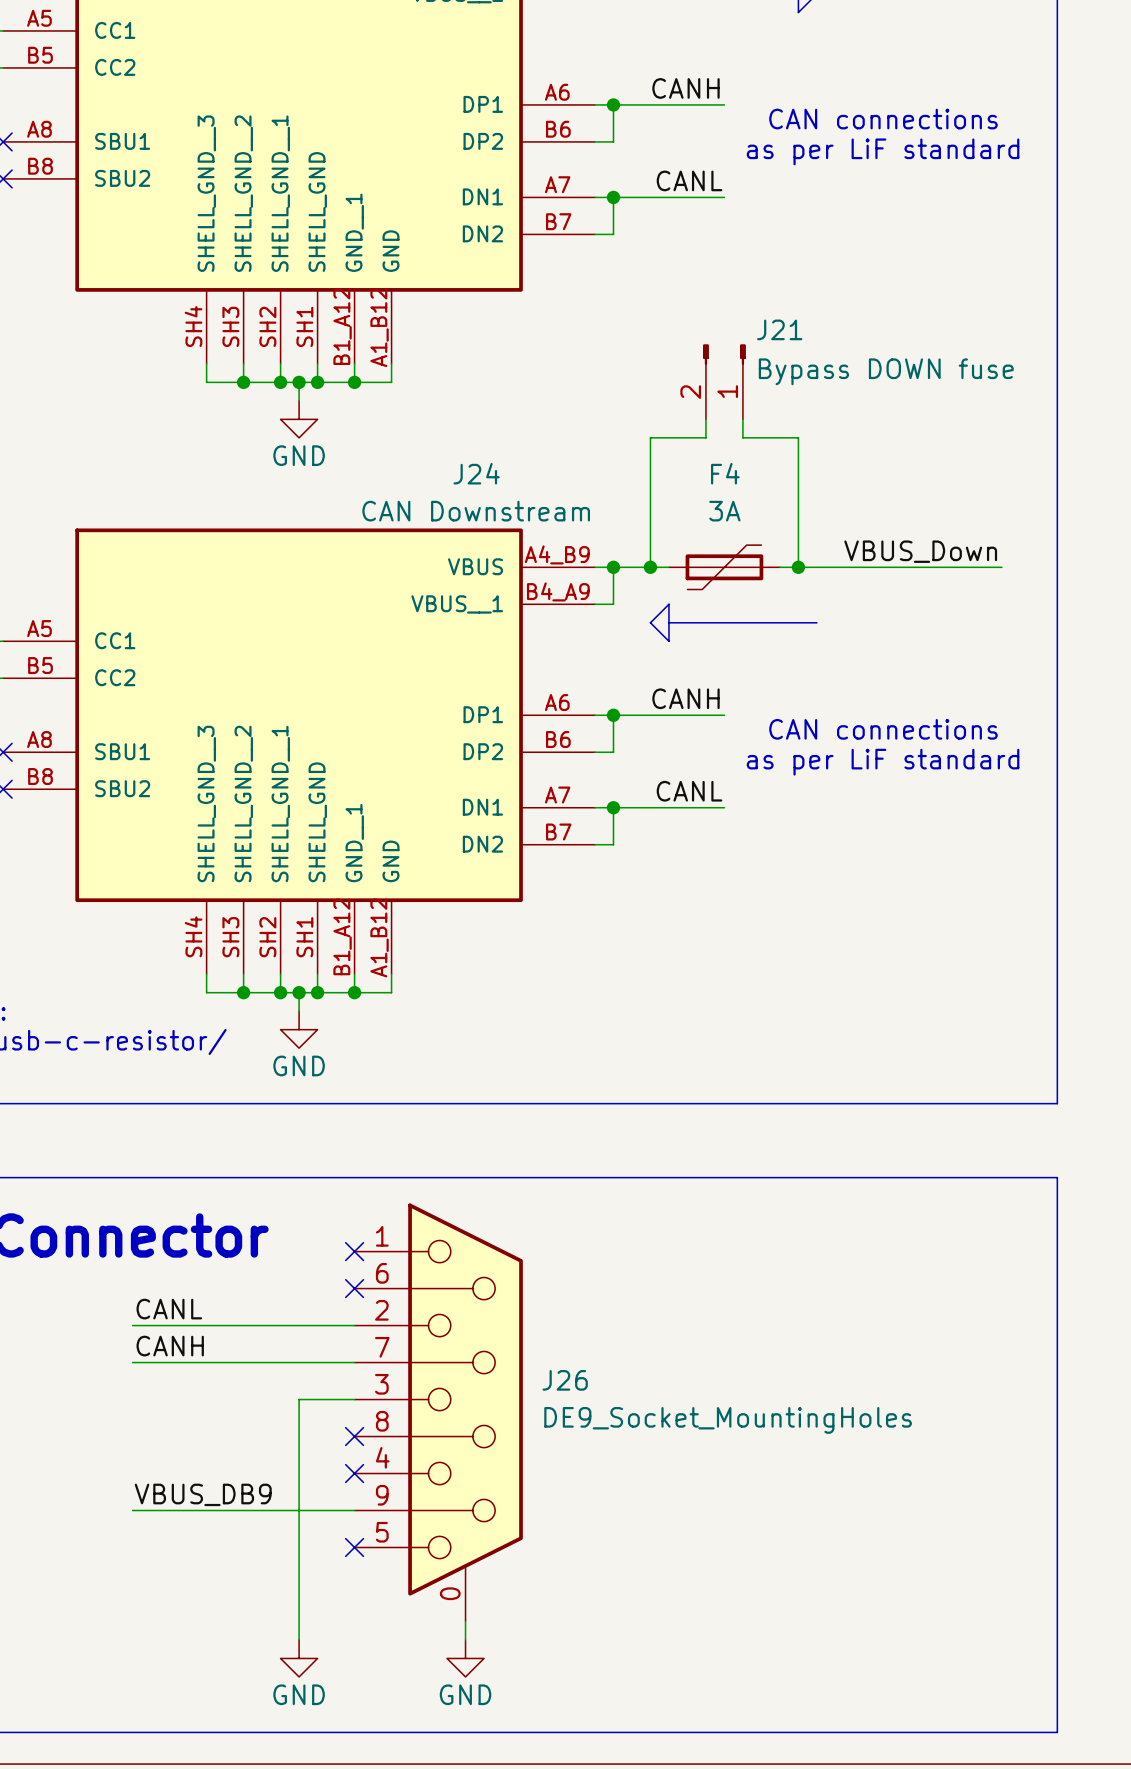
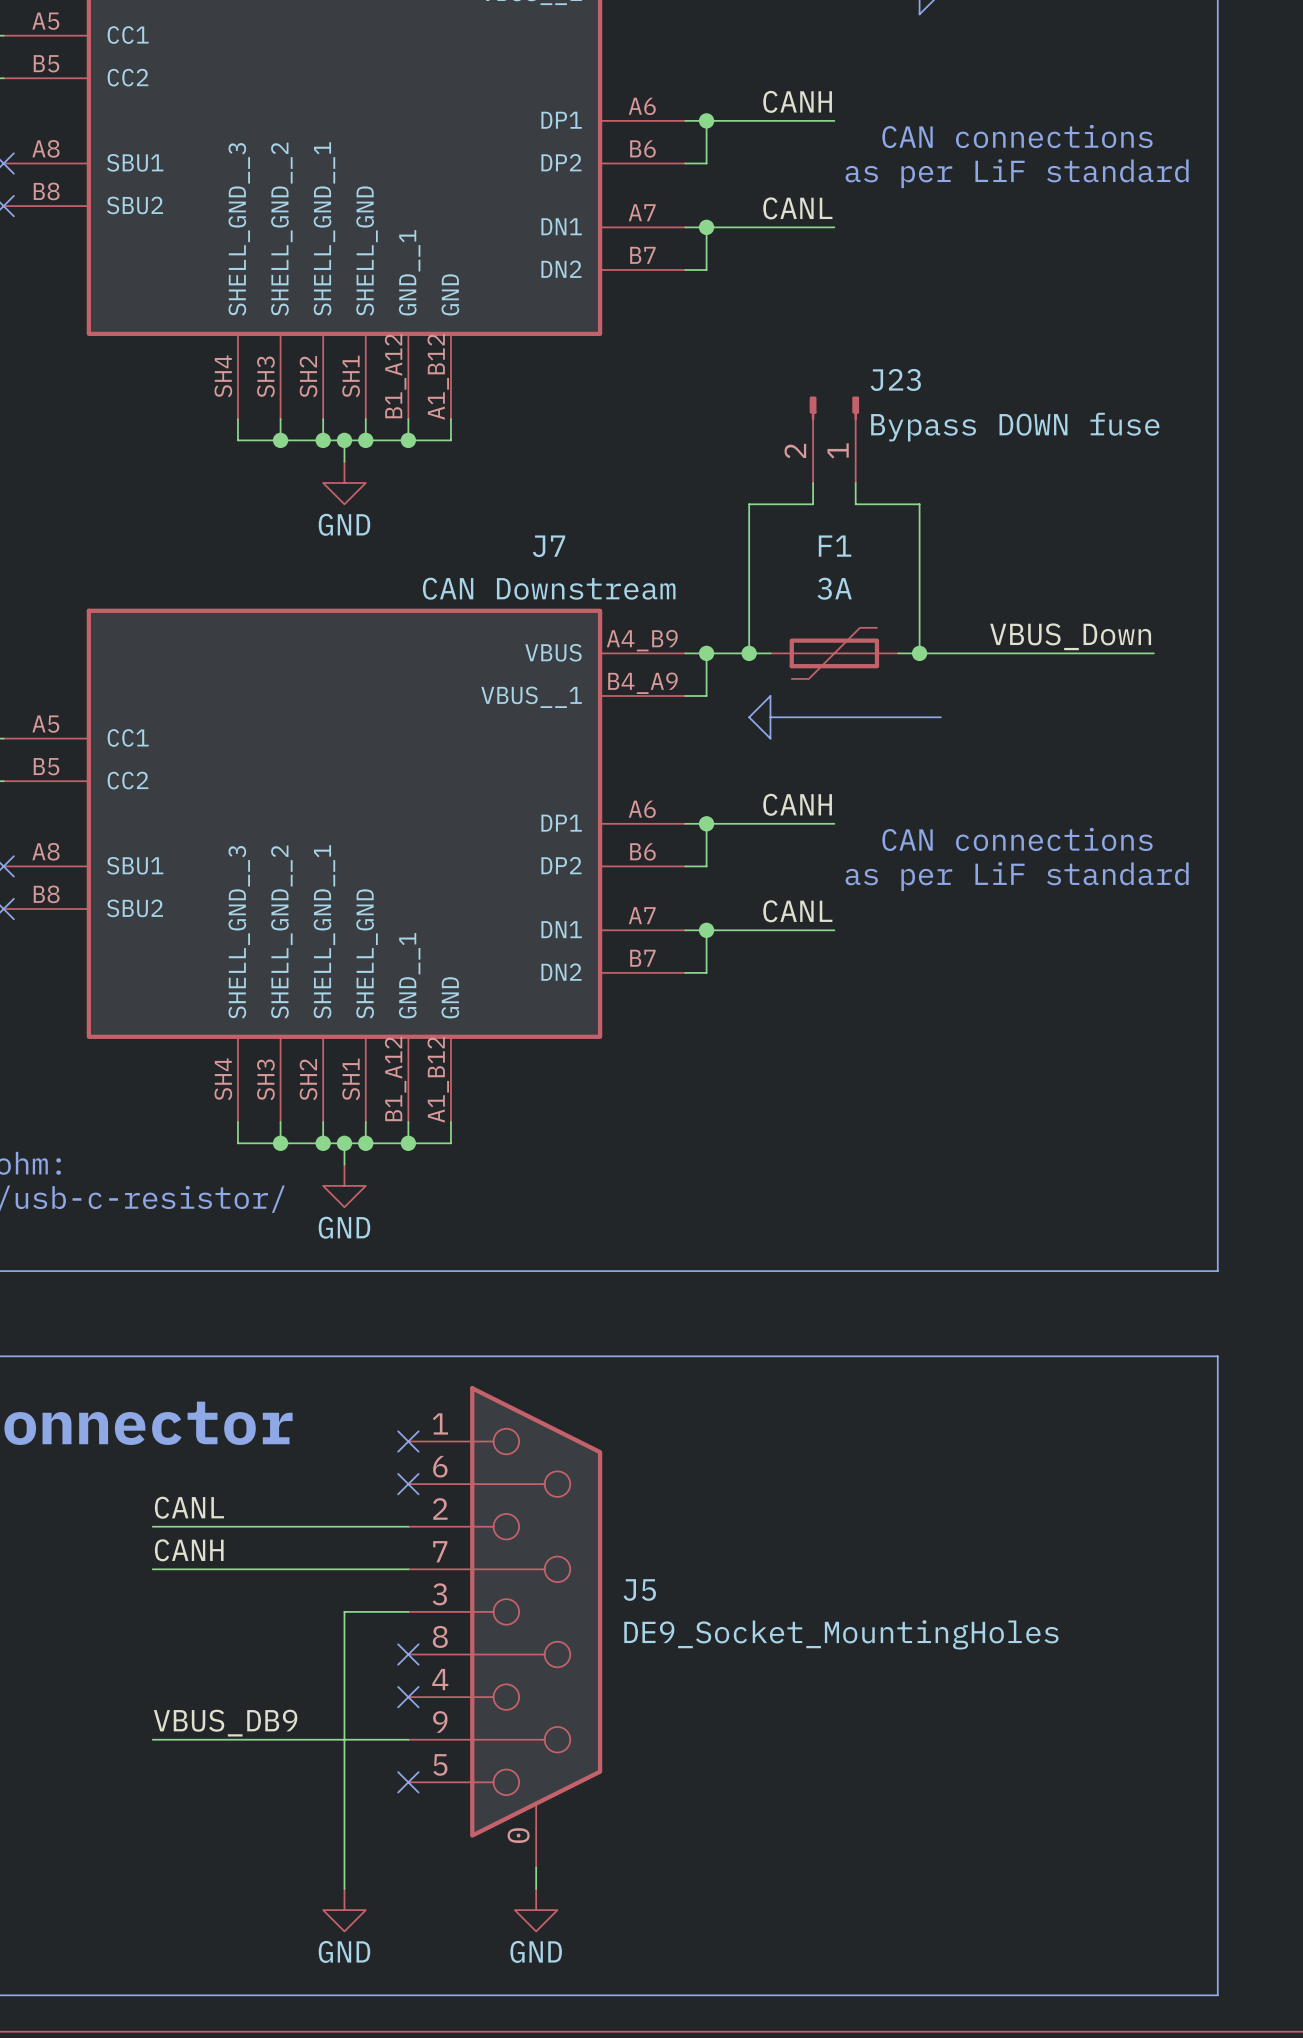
J21 name: J21 (779, 329) -> J23 (895, 379)
J24 name: J24 (476, 473) -> J7 (549, 546)
F4 name: F4 (725, 473) -> F1 (835, 546)
J26 name: J26 (565, 1380) -> J5 (639, 1590)

